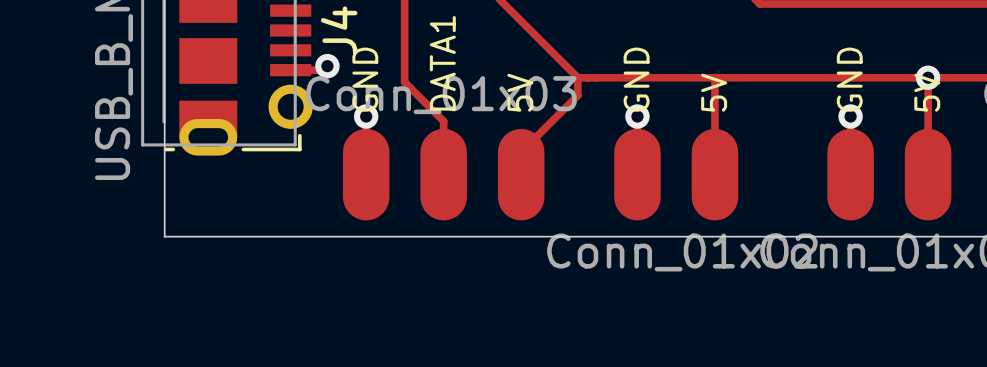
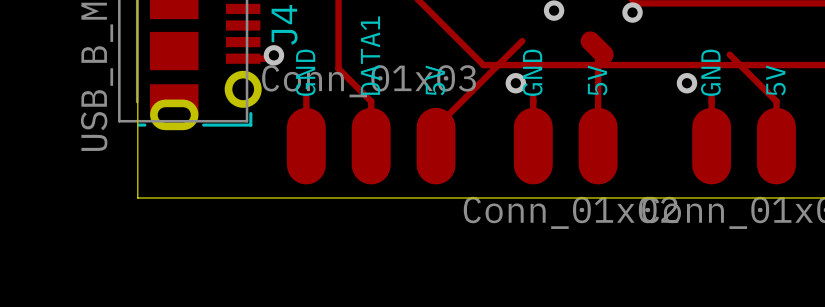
via: none -> (554, 10)
via: none -> (632, 12)
track: none -> (590, 41) (604, 54) (598, 60) (598, 65)
track: (577, 77) (577, 95) -> (522, 41) (483, 79)
track: (928, 77) (928, 121) -> (729, 54) (776, 101)
via: (928, 77) -> none
via: (366, 116) -> none
via position: (637, 116) -> (515, 83)
via position: (850, 116) -> (687, 83)

